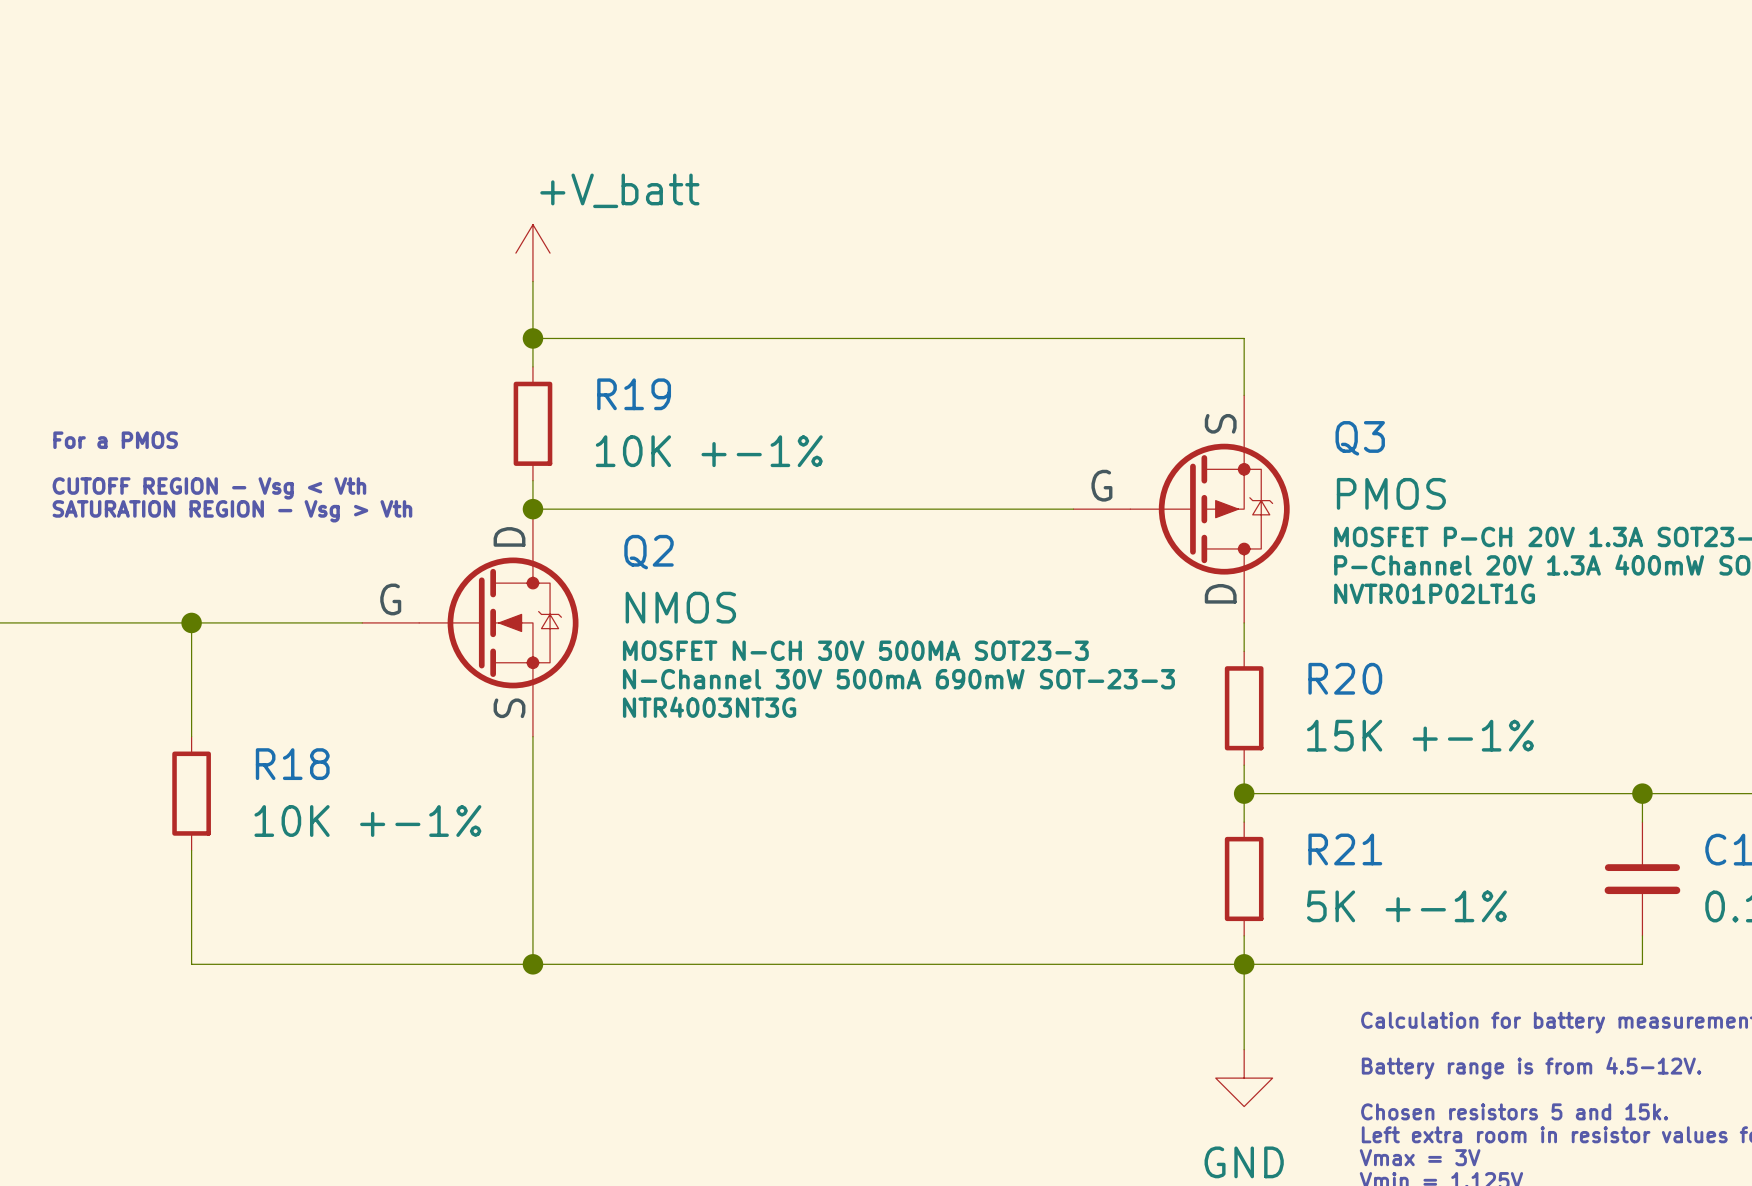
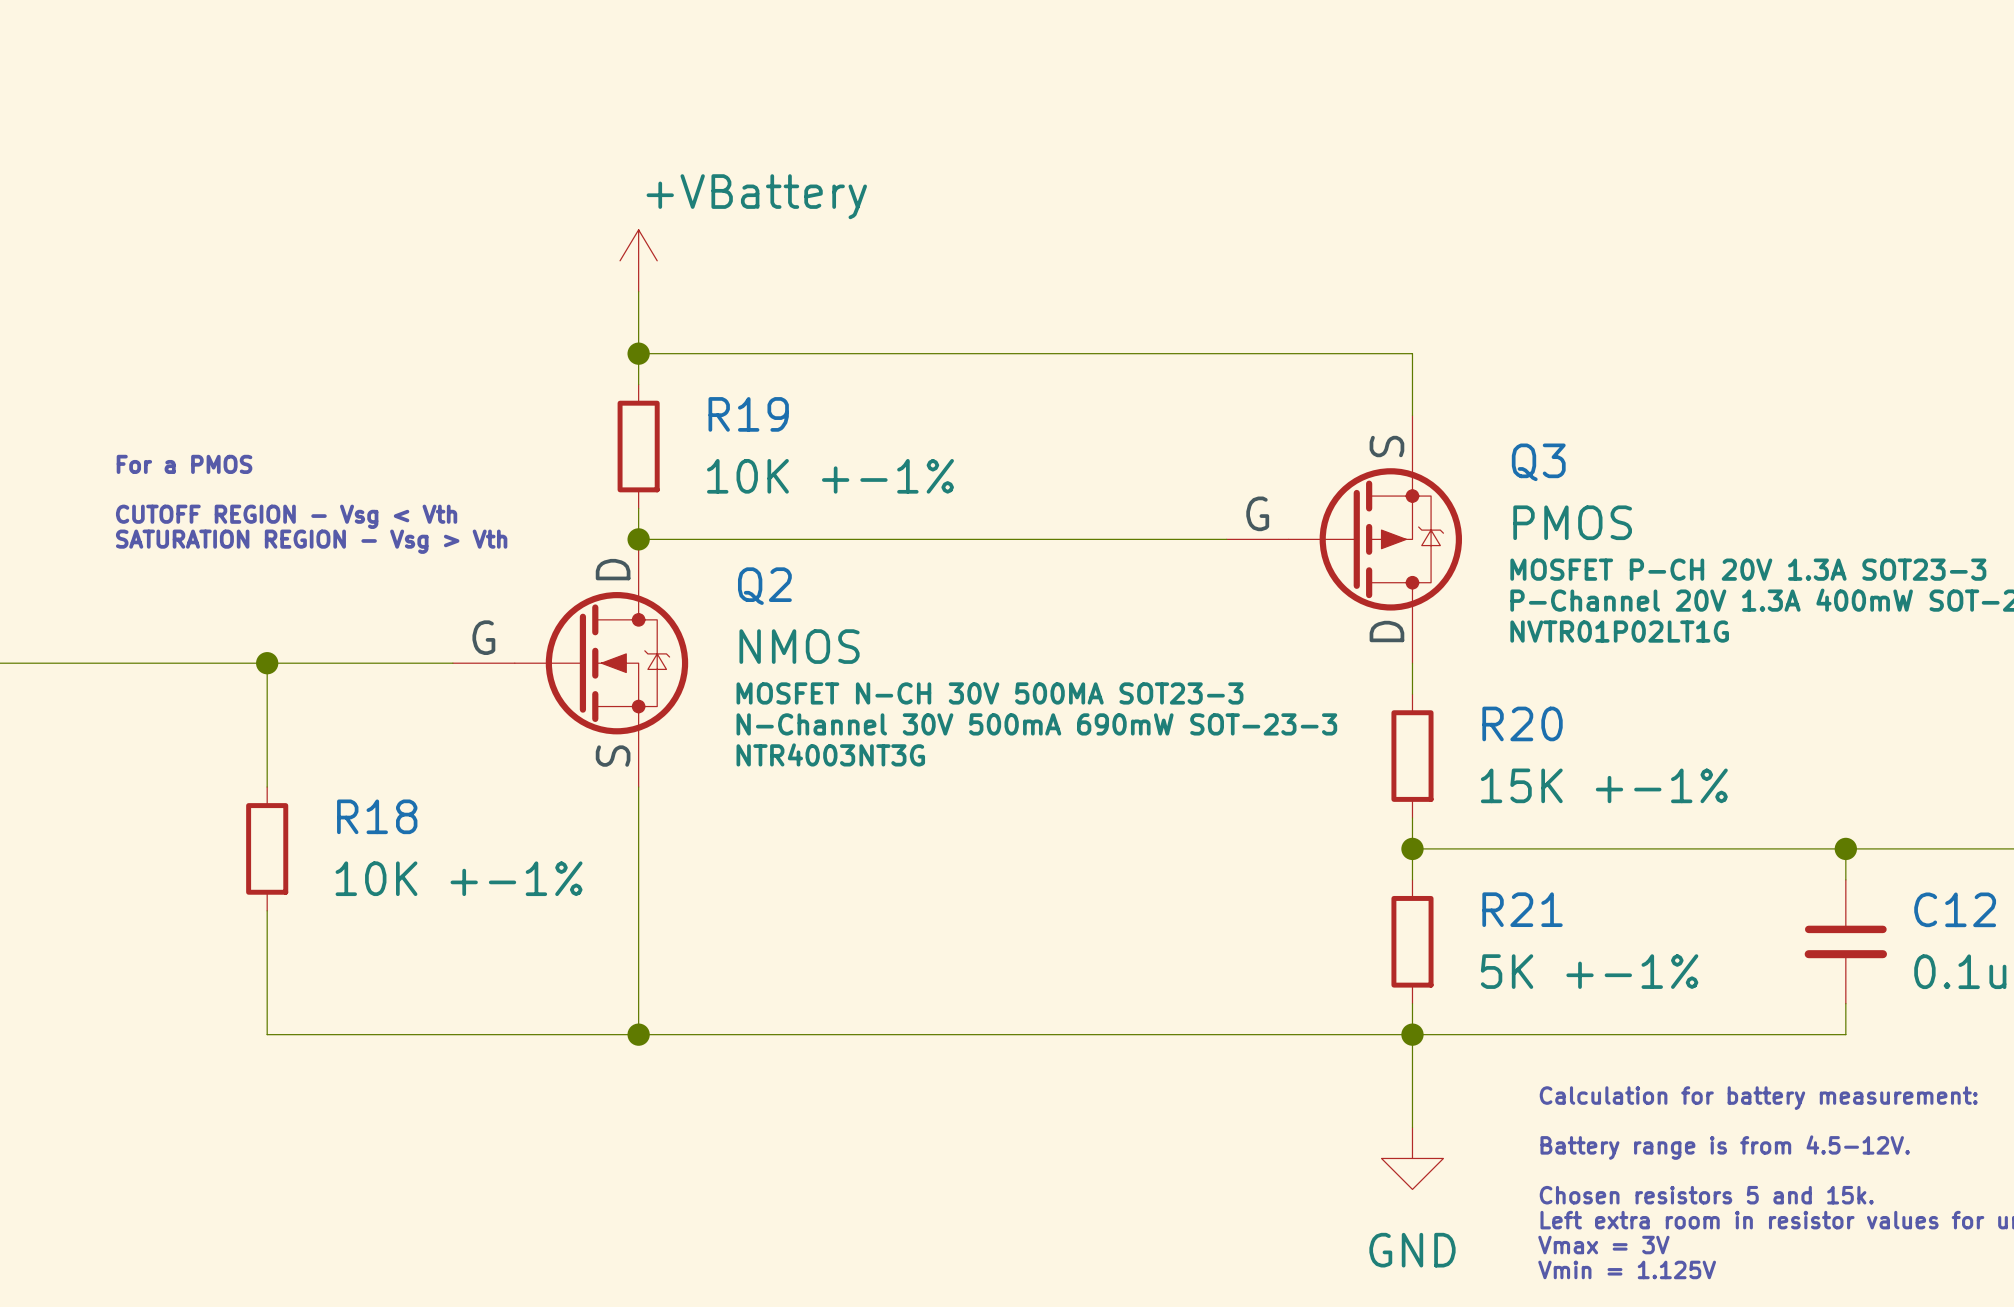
power symbol: +V_batt (532, 253) -> +VBattery (638, 260)

